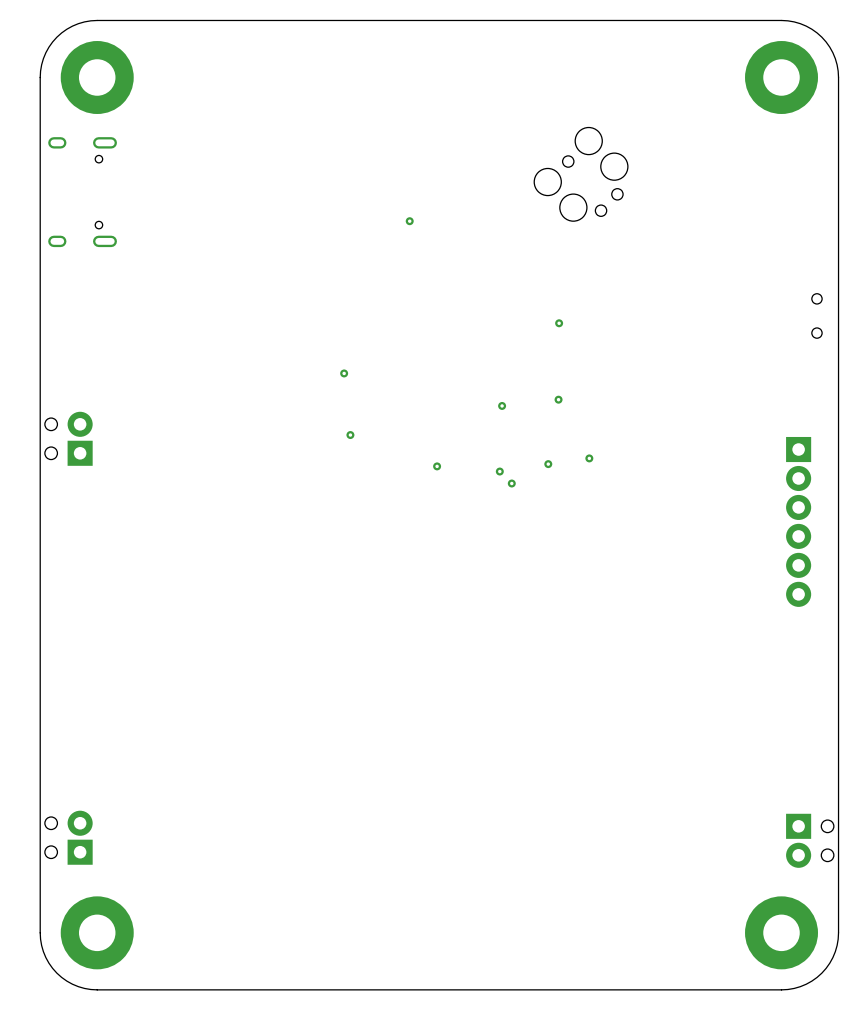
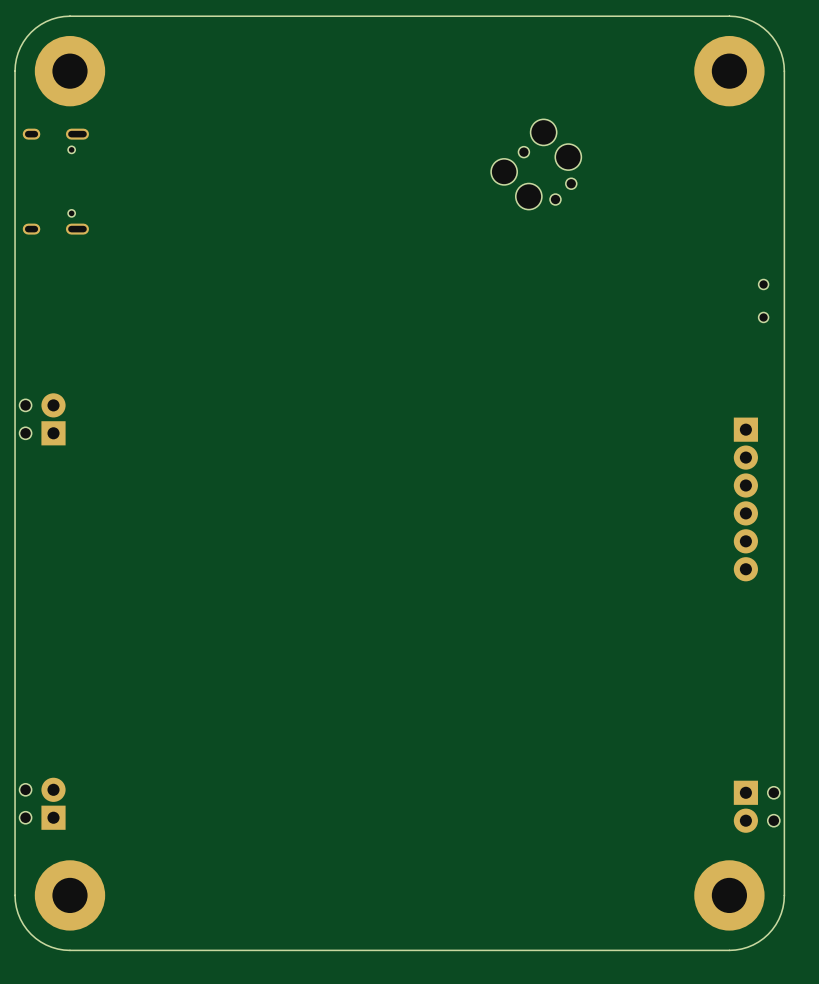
via: (409, 221) -> none
via: (559, 323) -> none
via: (344, 373) -> none
via: (558, 399) -> none
via: (502, 405) -> none
via: (350, 435) -> none
via: (589, 458) -> none
via: (548, 464) -> none
via: (437, 466) -> none
via: (499, 471) -> none
via: (511, 483) -> none

